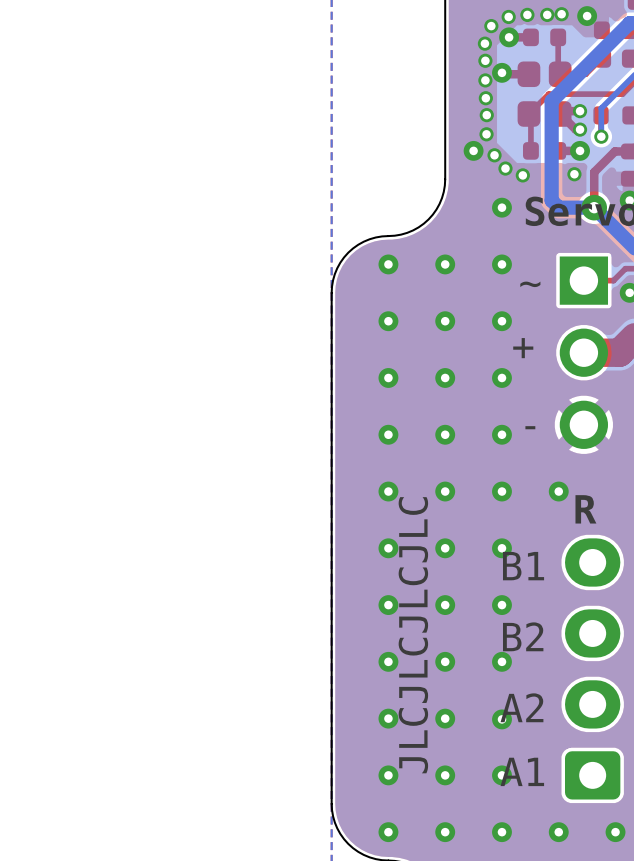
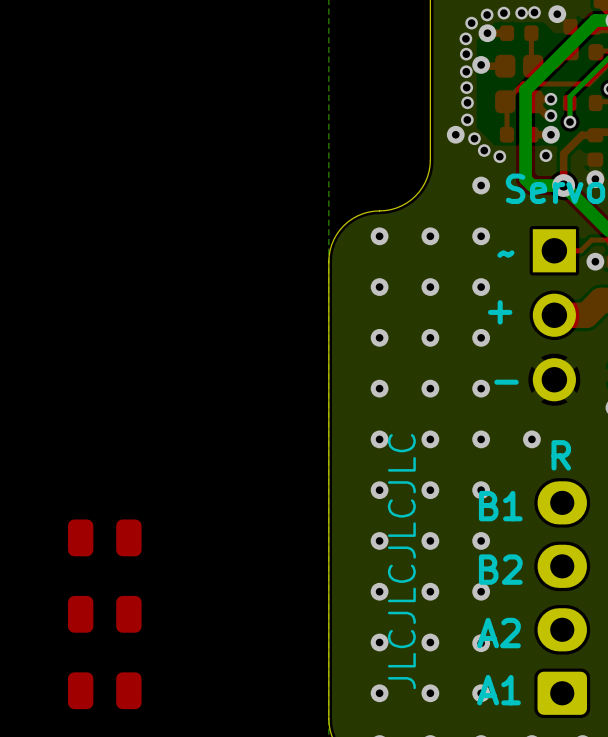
part: none -> (104, 537)
part: none -> (104, 614)
part: none -> (104, 690)

